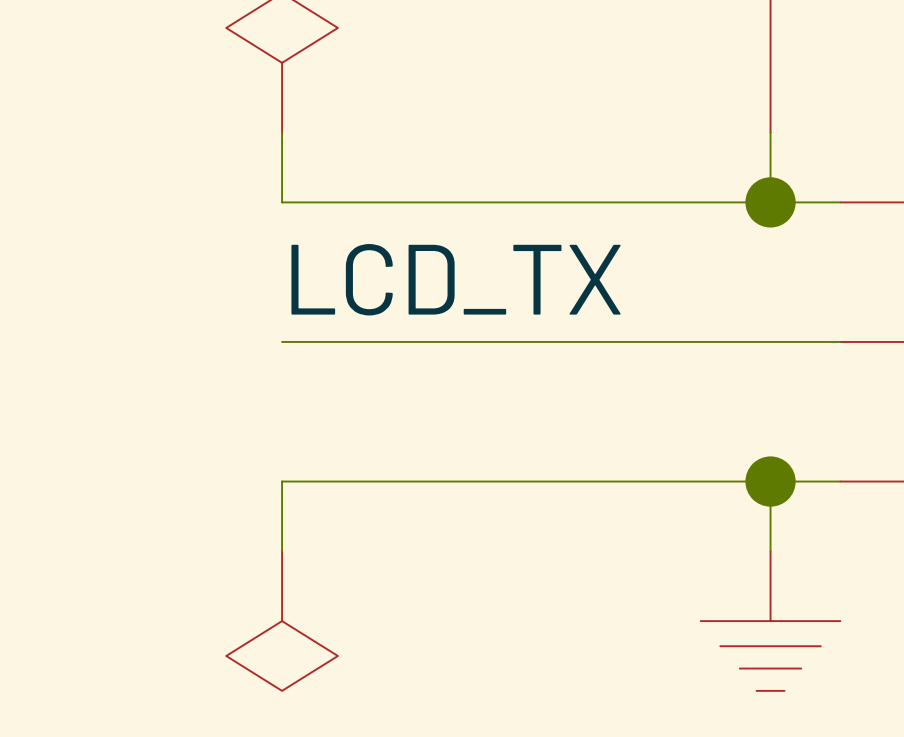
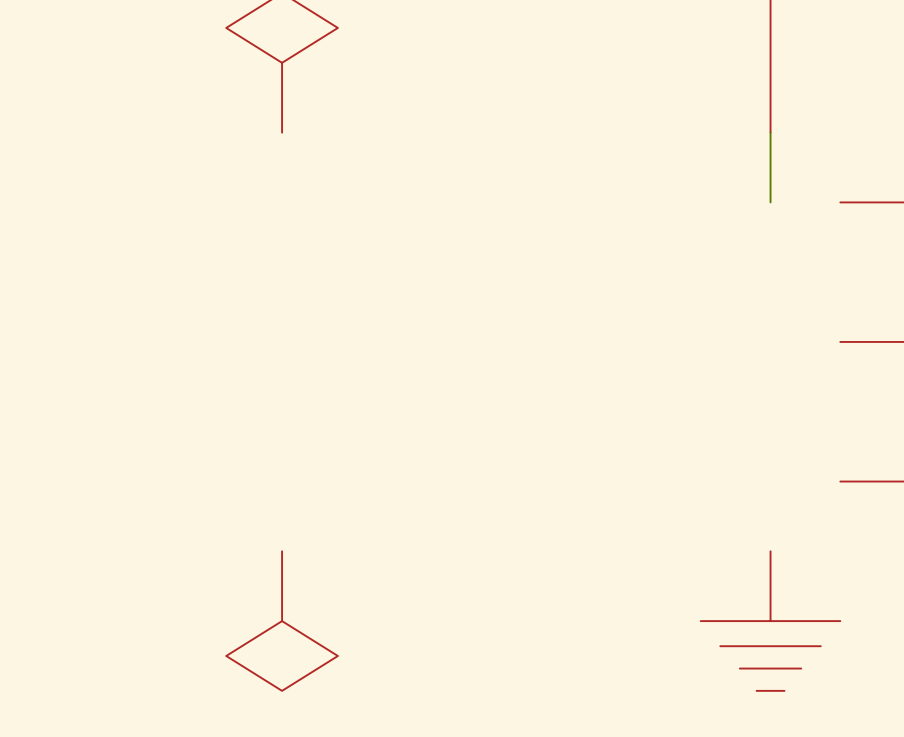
wire: (282, 132) (282, 202) (840, 202) -> none
junction: (770, 202) -> none
label: LCD_TX (456, 279) -> none
wire: (282, 341) (840, 341) -> none
wire: (770, 481) (770, 551) -> none
junction: (770, 481) -> none
wire: (840, 481) (282, 481) (282, 551) -> none

